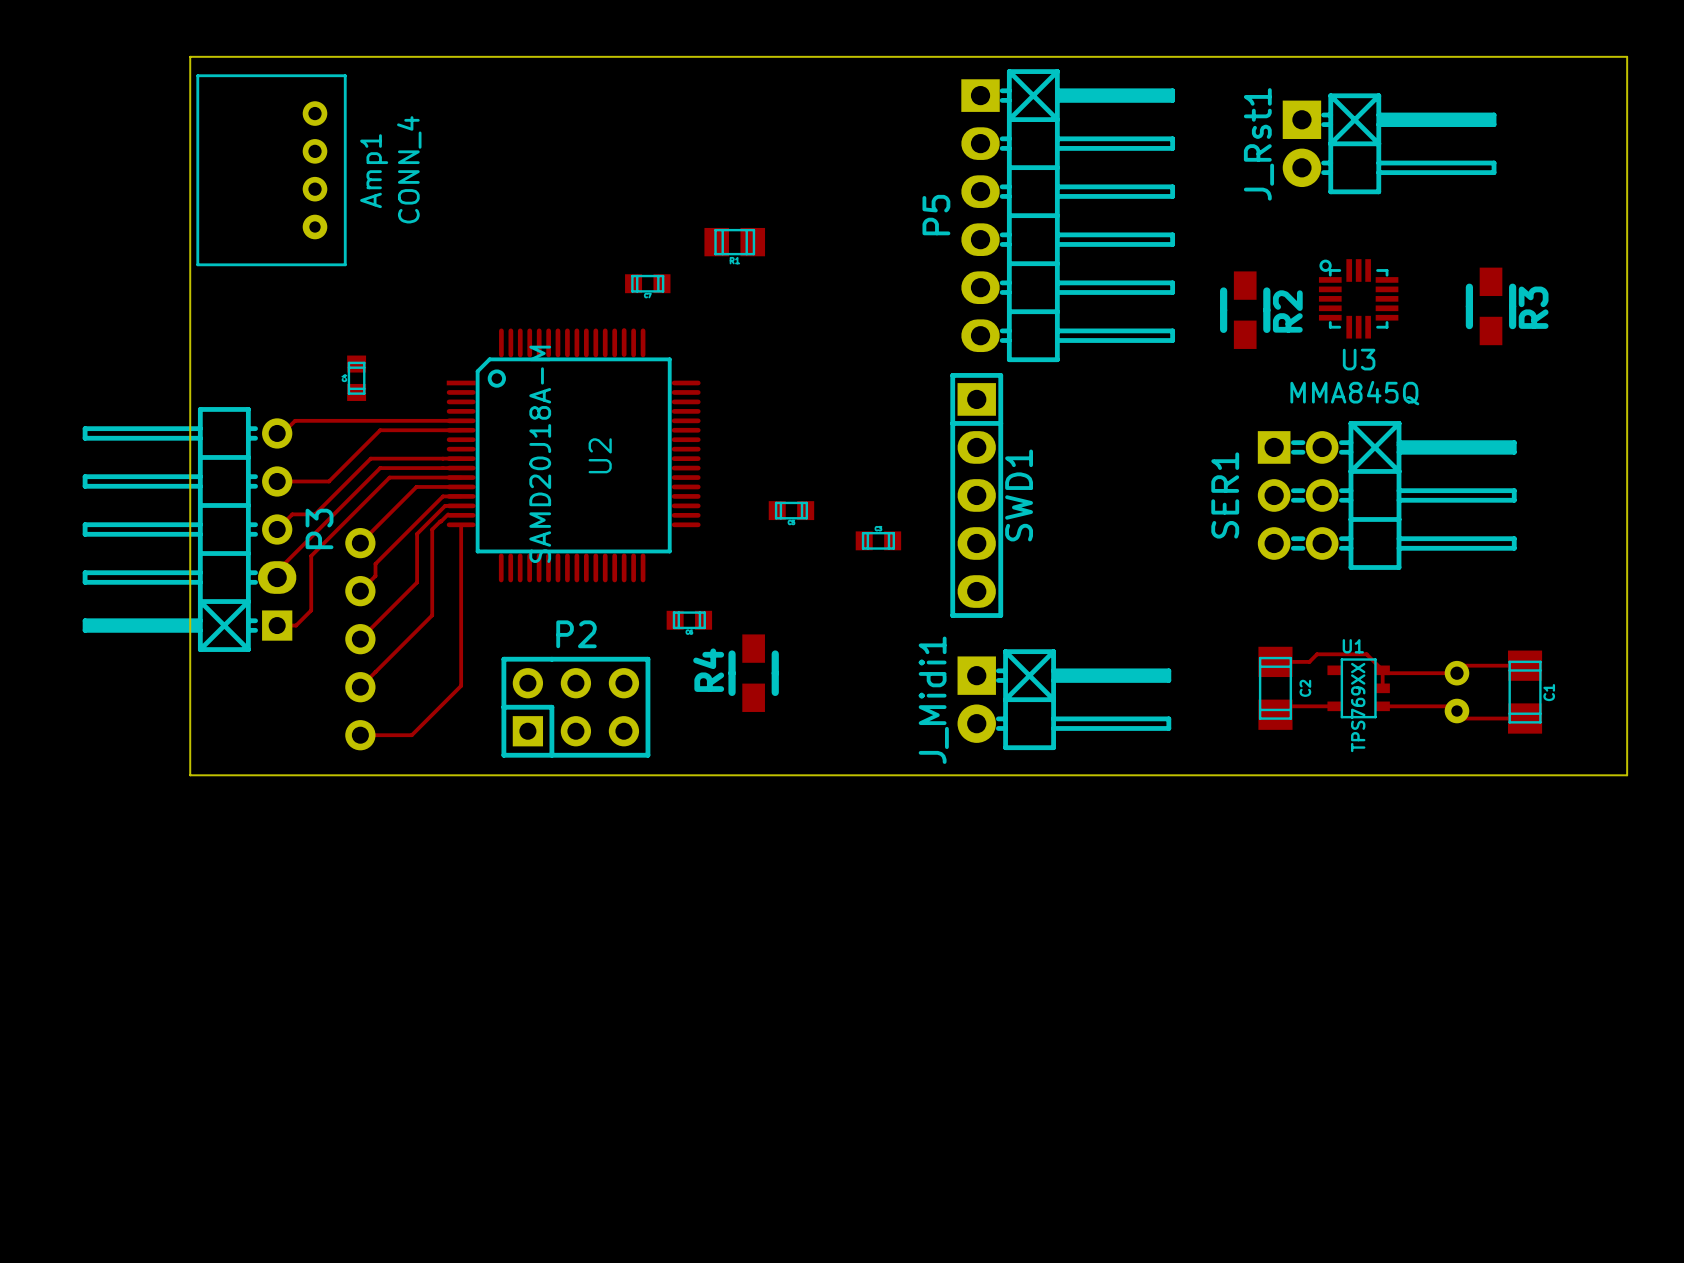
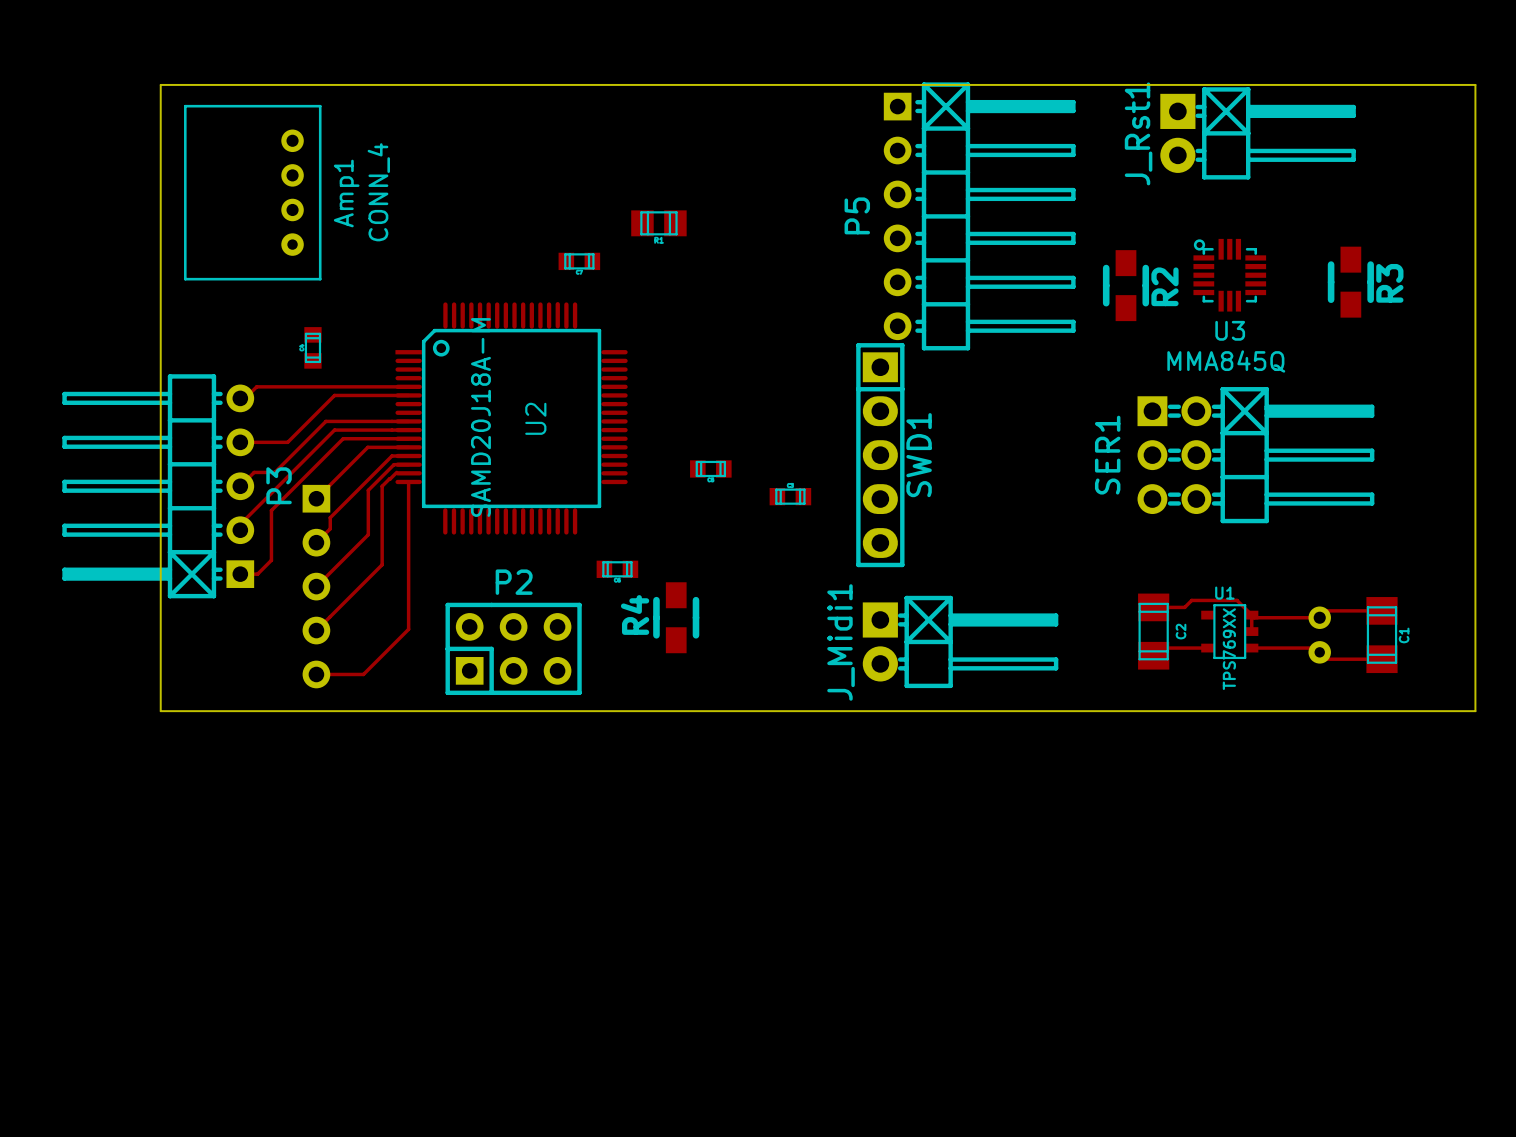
P5 footprint: [961, 69, 1176, 363] -> [883, 82, 1076, 351]
board edge: (190, 90) (190, 56) (1627, 56) (1627, 90) -> (160, 84) (1475, 84)
Amp1 position: (271, 170) -> (252, 192)
P3 footprint: [82, 407, 297, 652] -> [62, 374, 255, 599]
part footprint: [345, 527, 376, 751] -> [302, 484, 331, 689]

